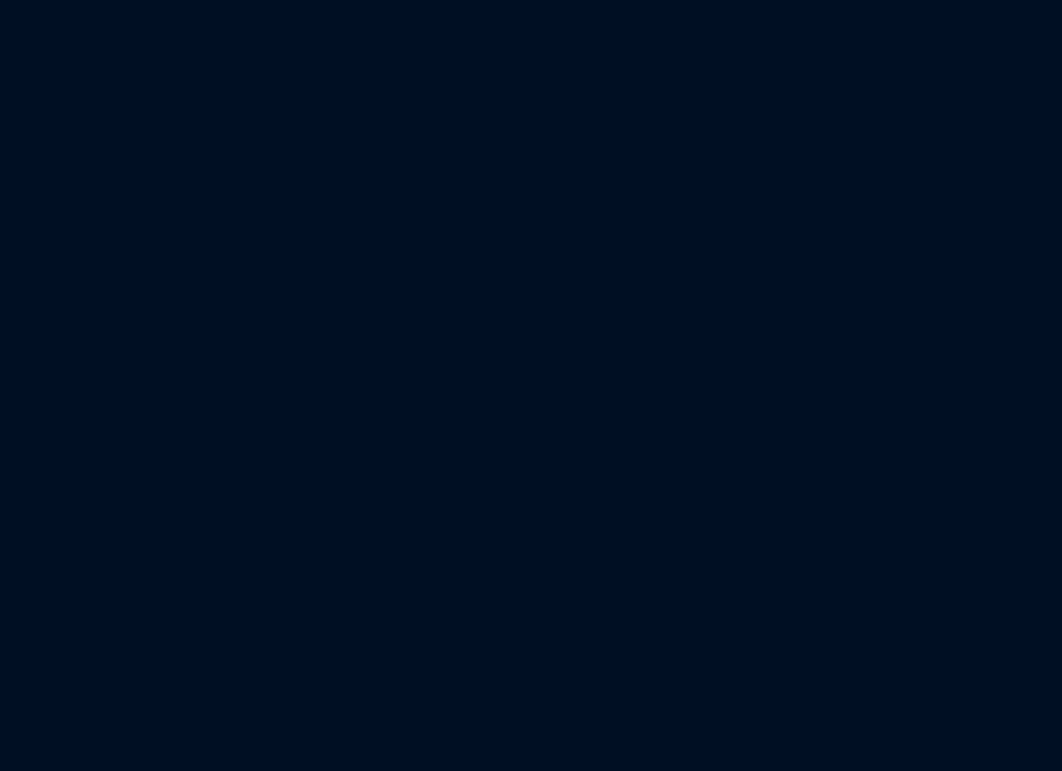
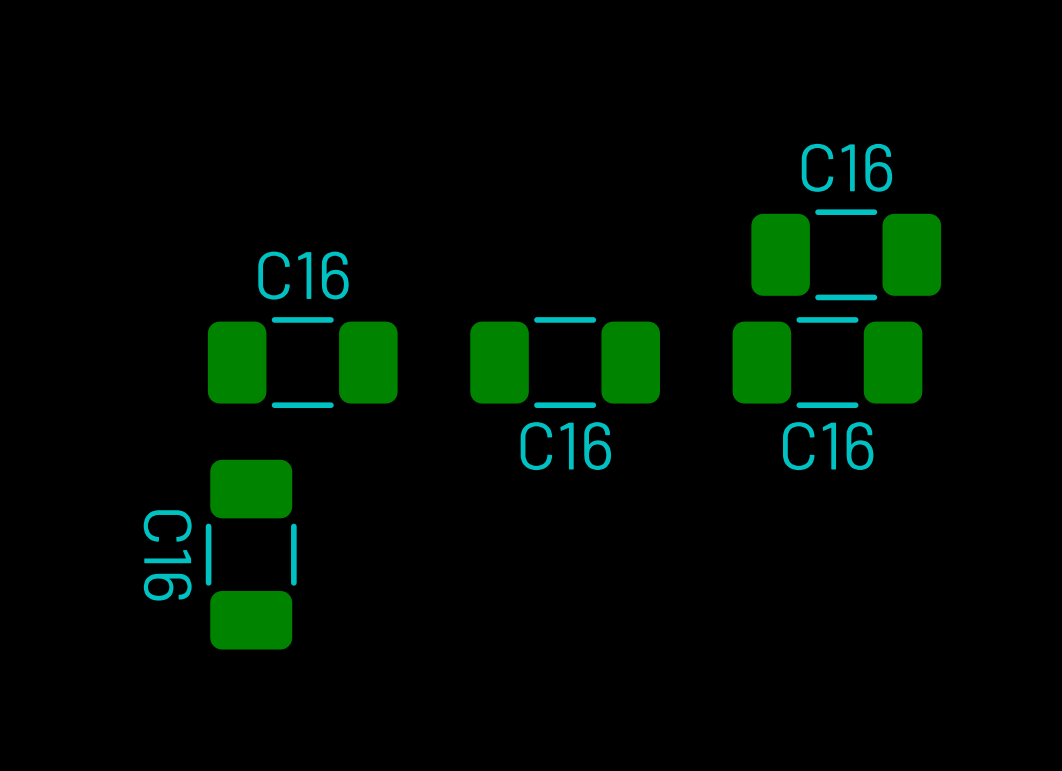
C16: none -> (846, 254)
C16: none -> (302, 362)
C16: none -> (565, 362)
C16: none -> (827, 362)
C16: none -> (251, 554)

